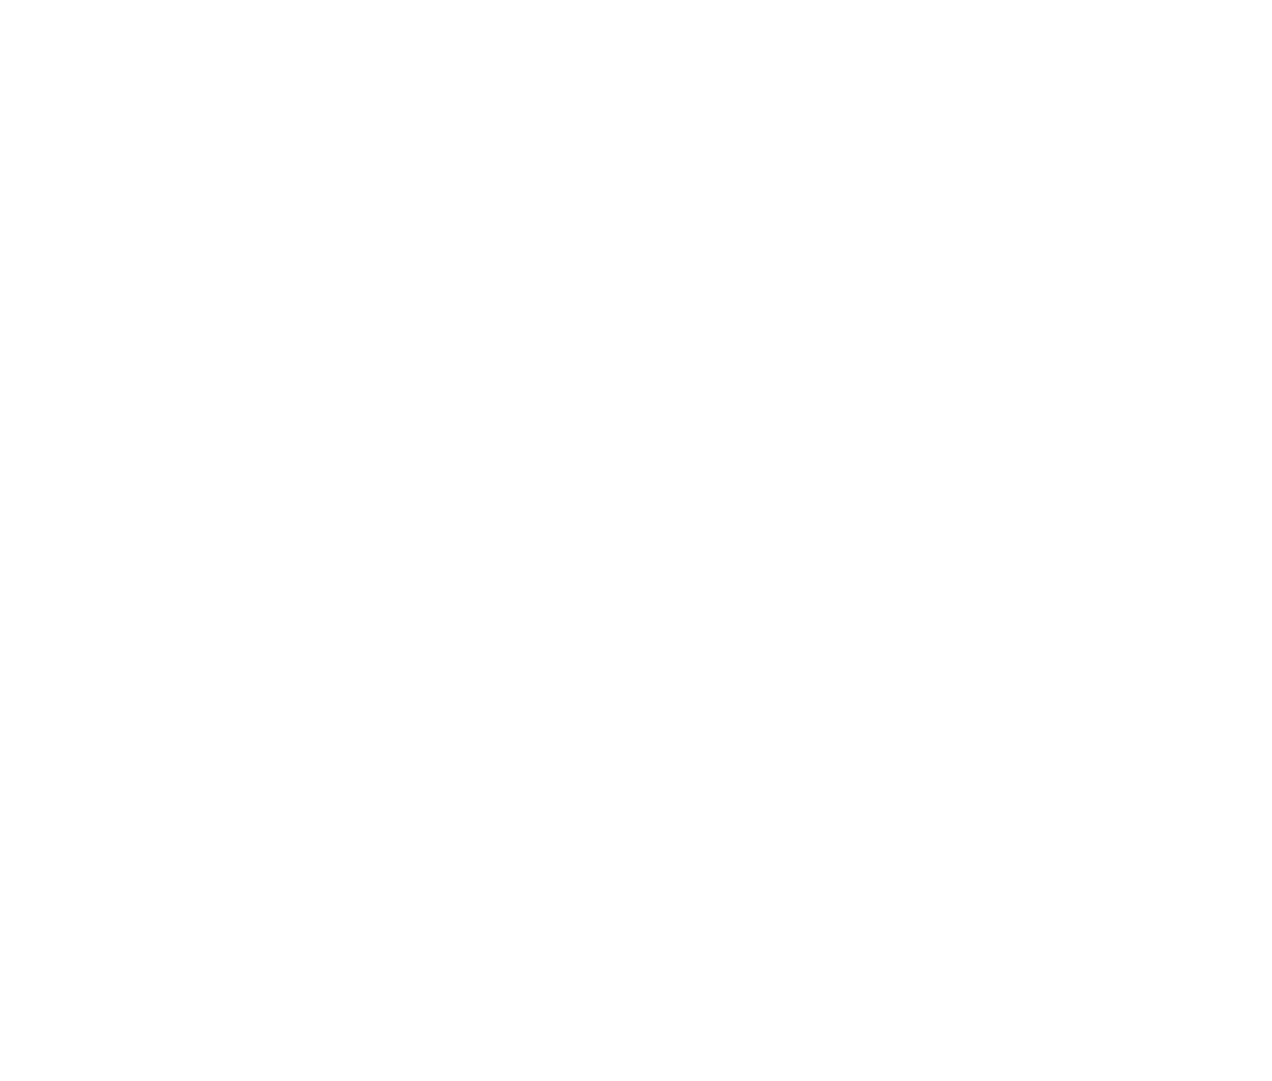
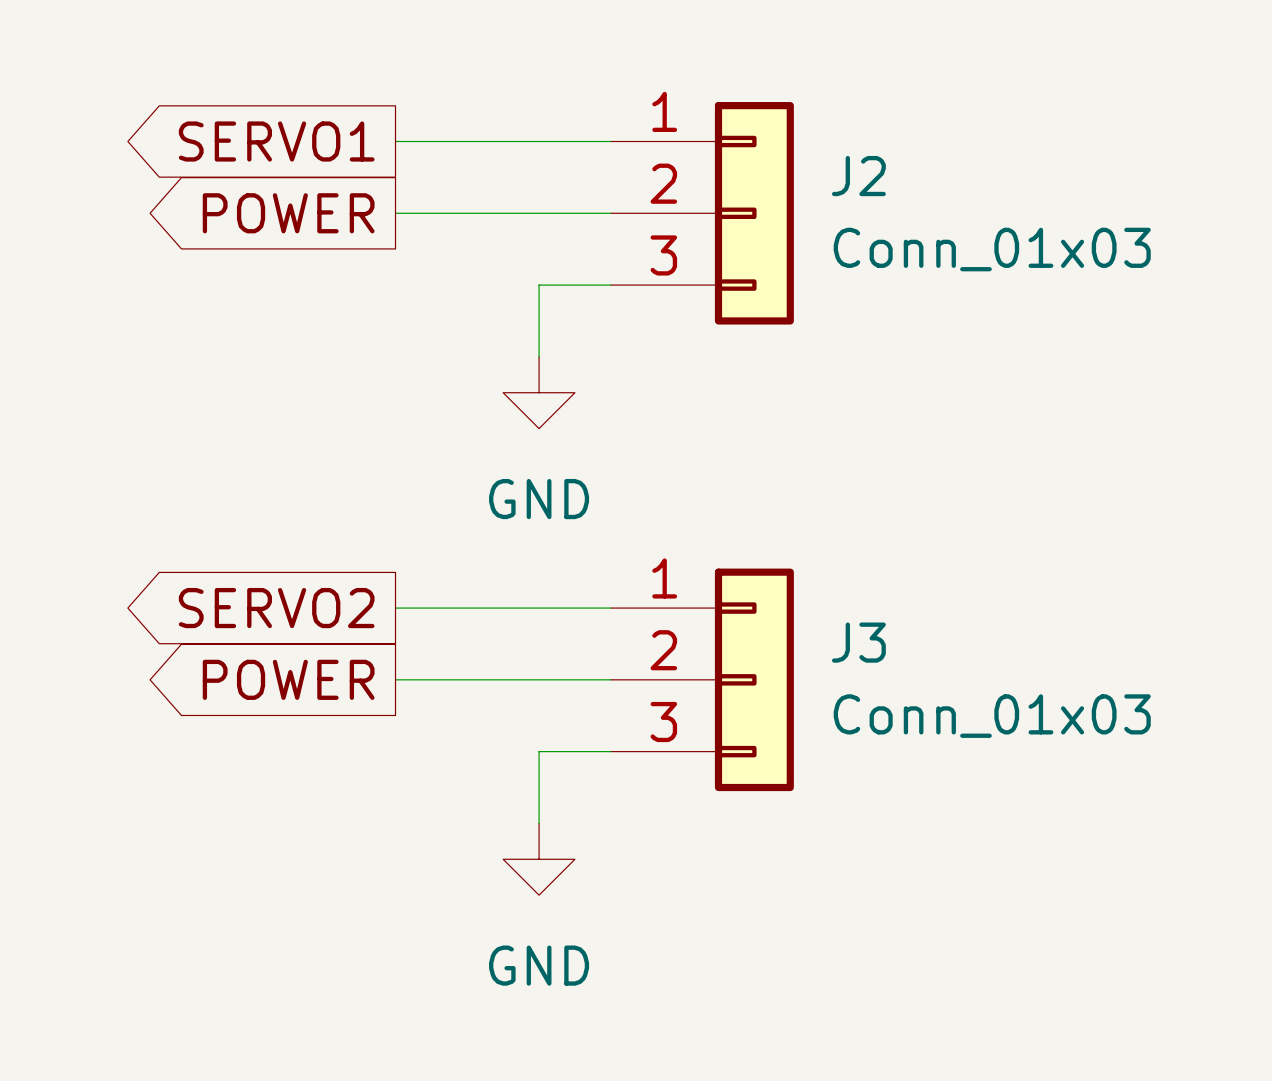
global label: none -> SERVO1 (276, 141)
wire: none -> (395, 141) (610, 141)
global label: none -> POWER (288, 213)
wire: none -> (395, 213) (610, 213)
J2: none -> Conn_01x03 (702, 213)
wire: none -> (610, 285) (539, 285) (539, 356)
power symbol: none -> GND (539, 392)
global label: none -> SERVO2 (276, 608)
wire: none -> (395, 608) (610, 608)
wire: none -> (395, 679) (610, 679)
J3: none -> Conn_01x03 (702, 679)
global label: none -> POWER (288, 679)
wire: none -> (610, 751) (539, 751) (539, 823)
power symbol: none -> GND (539, 859)

